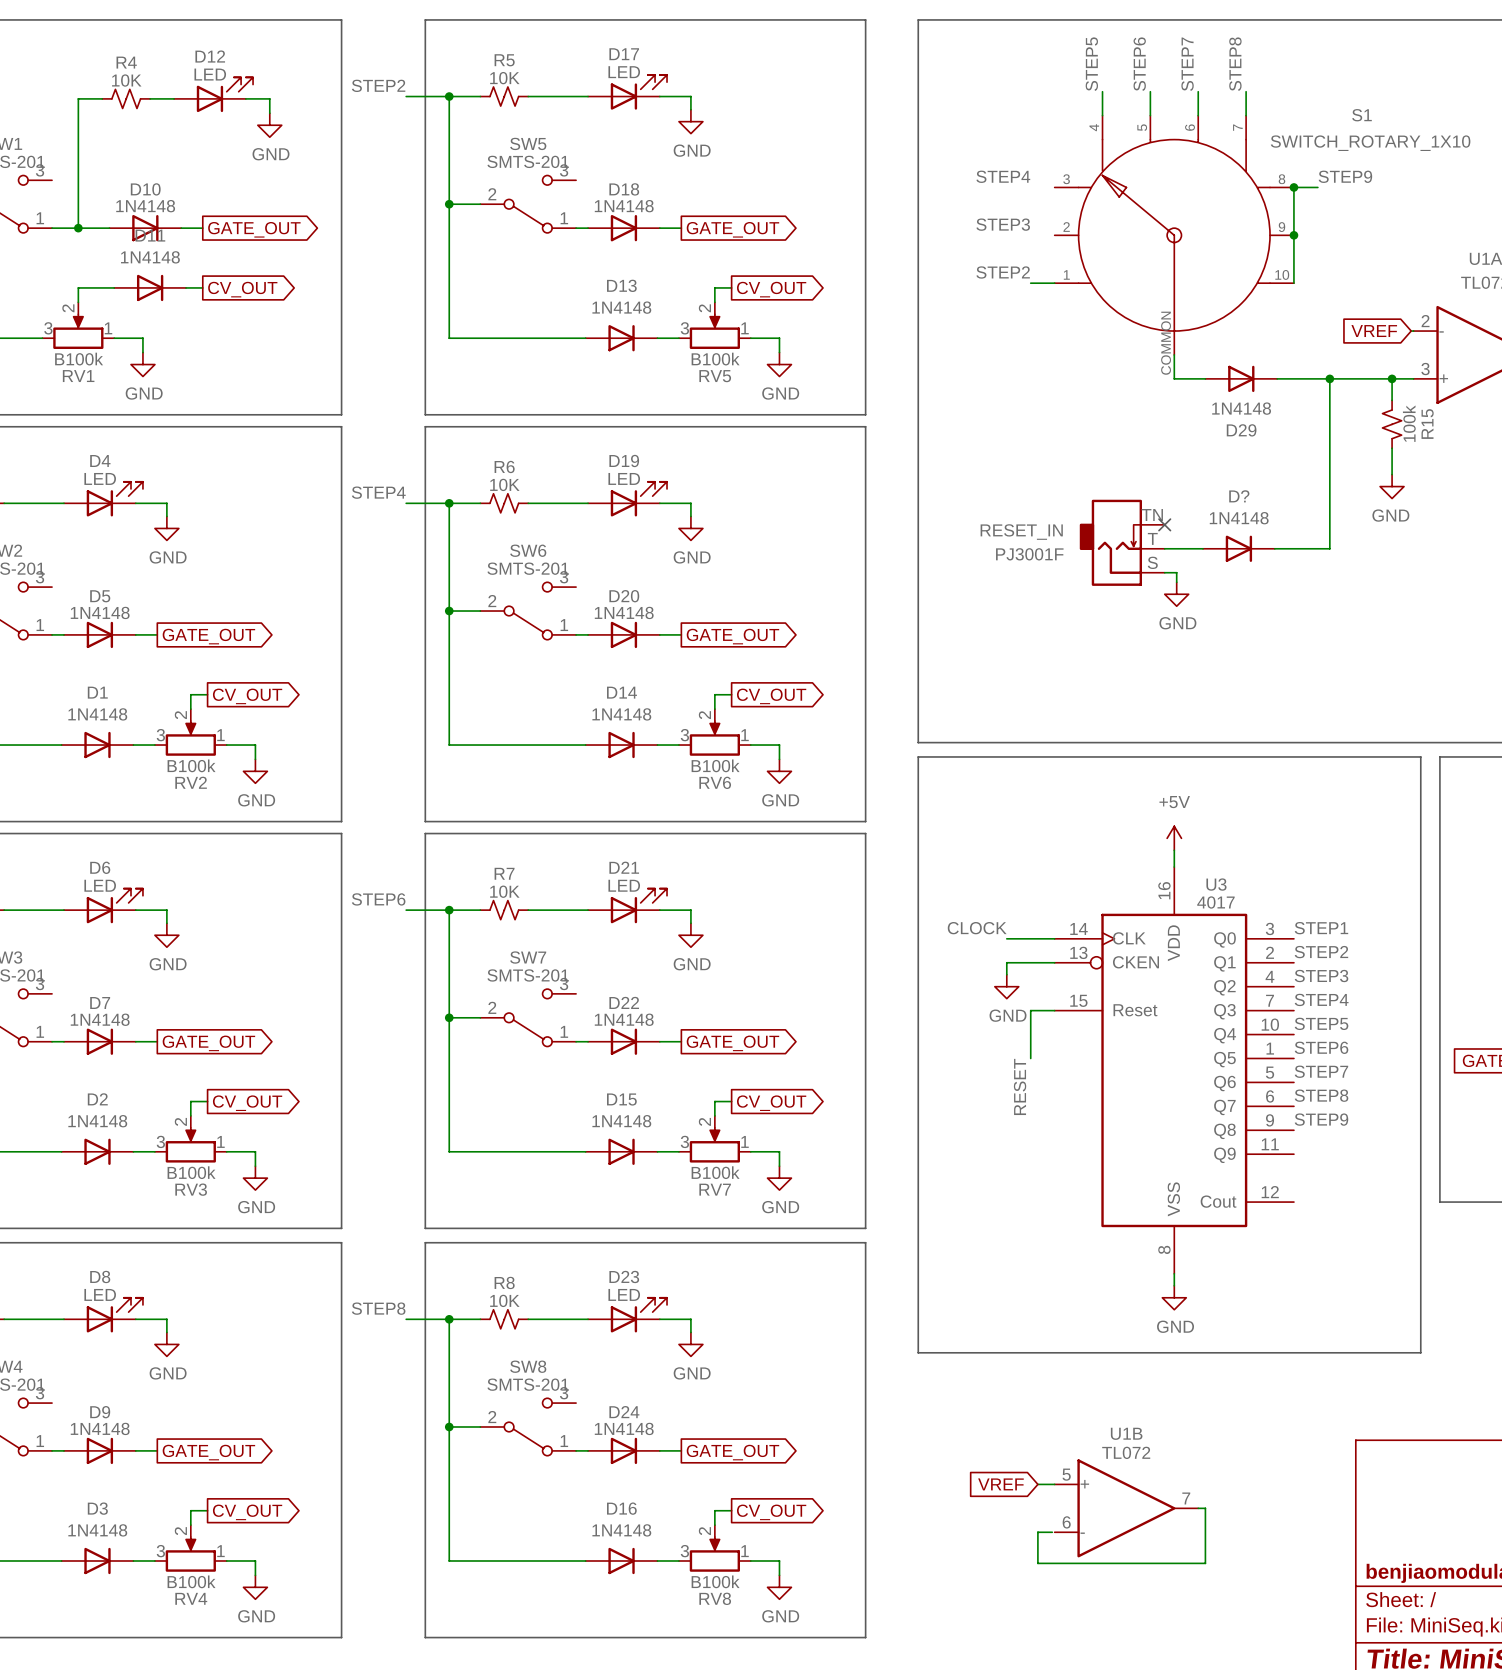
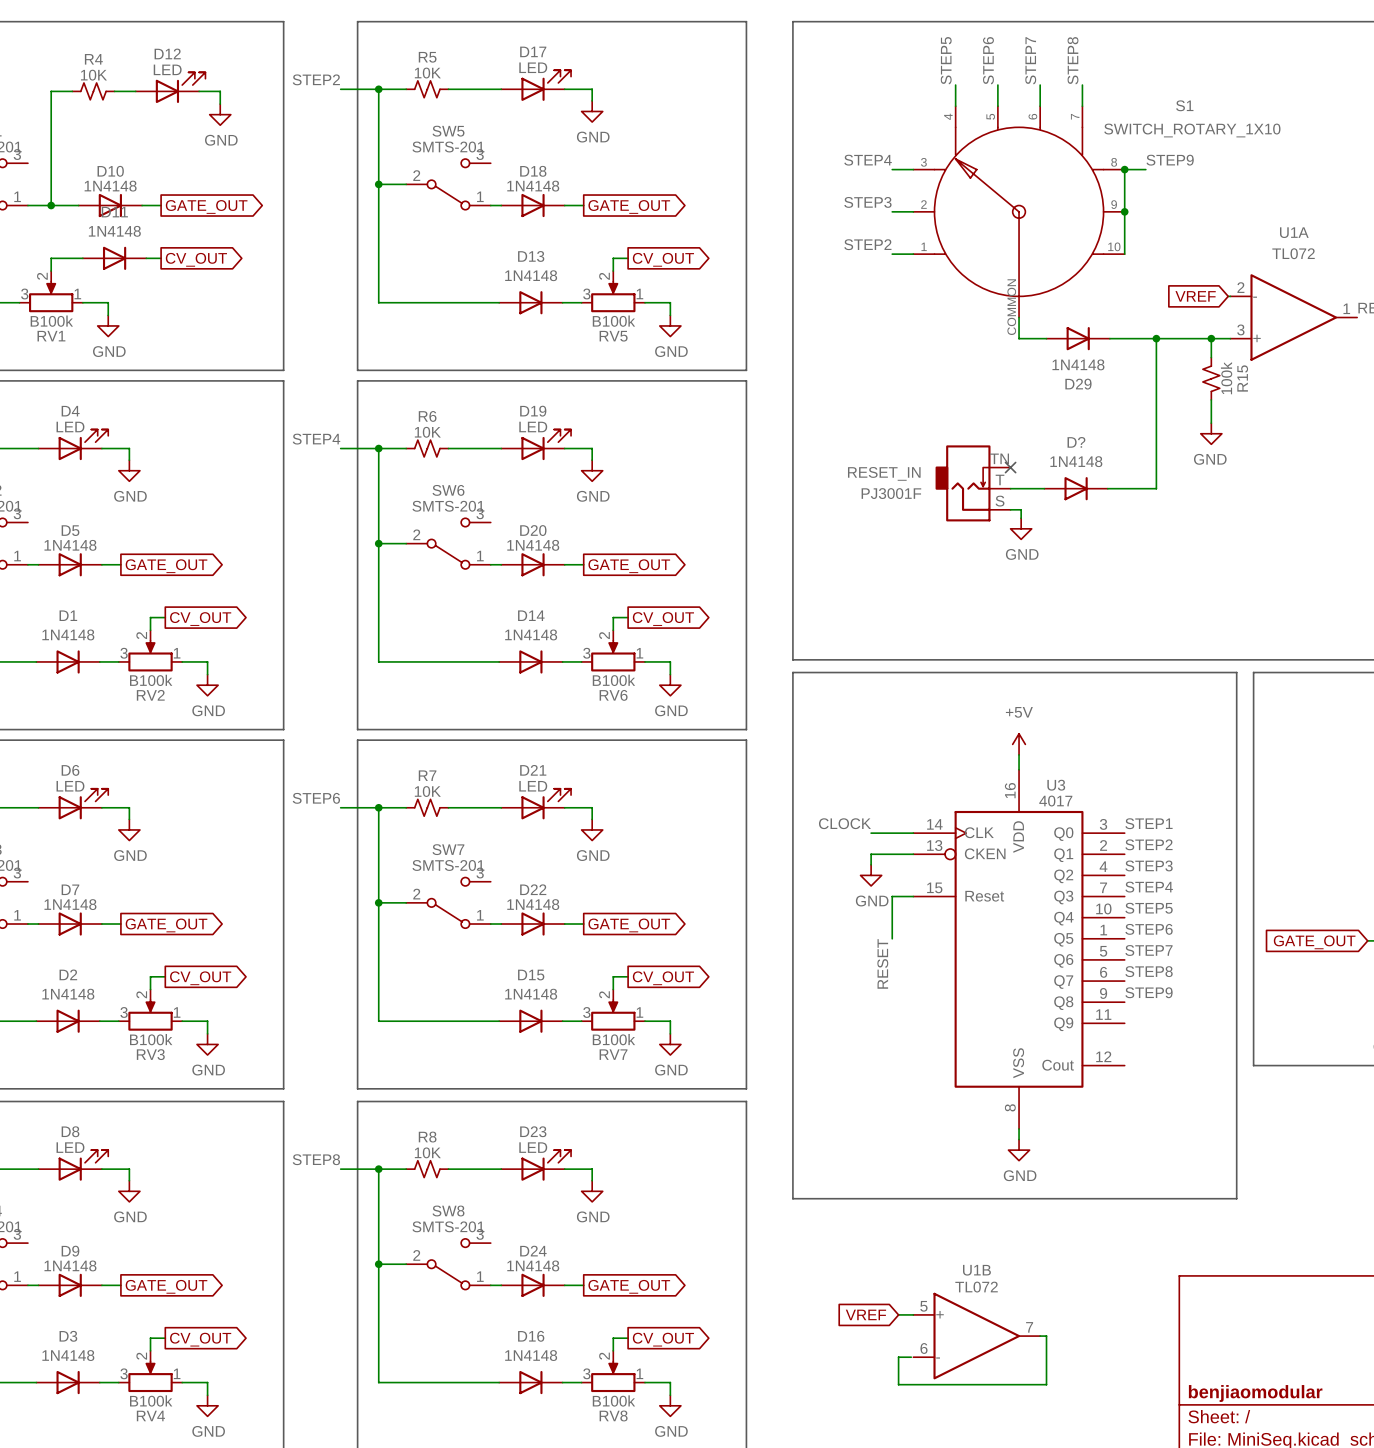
wire: none -> (892, 169) (913, 169)
wire: none -> (892, 211) (913, 211)

